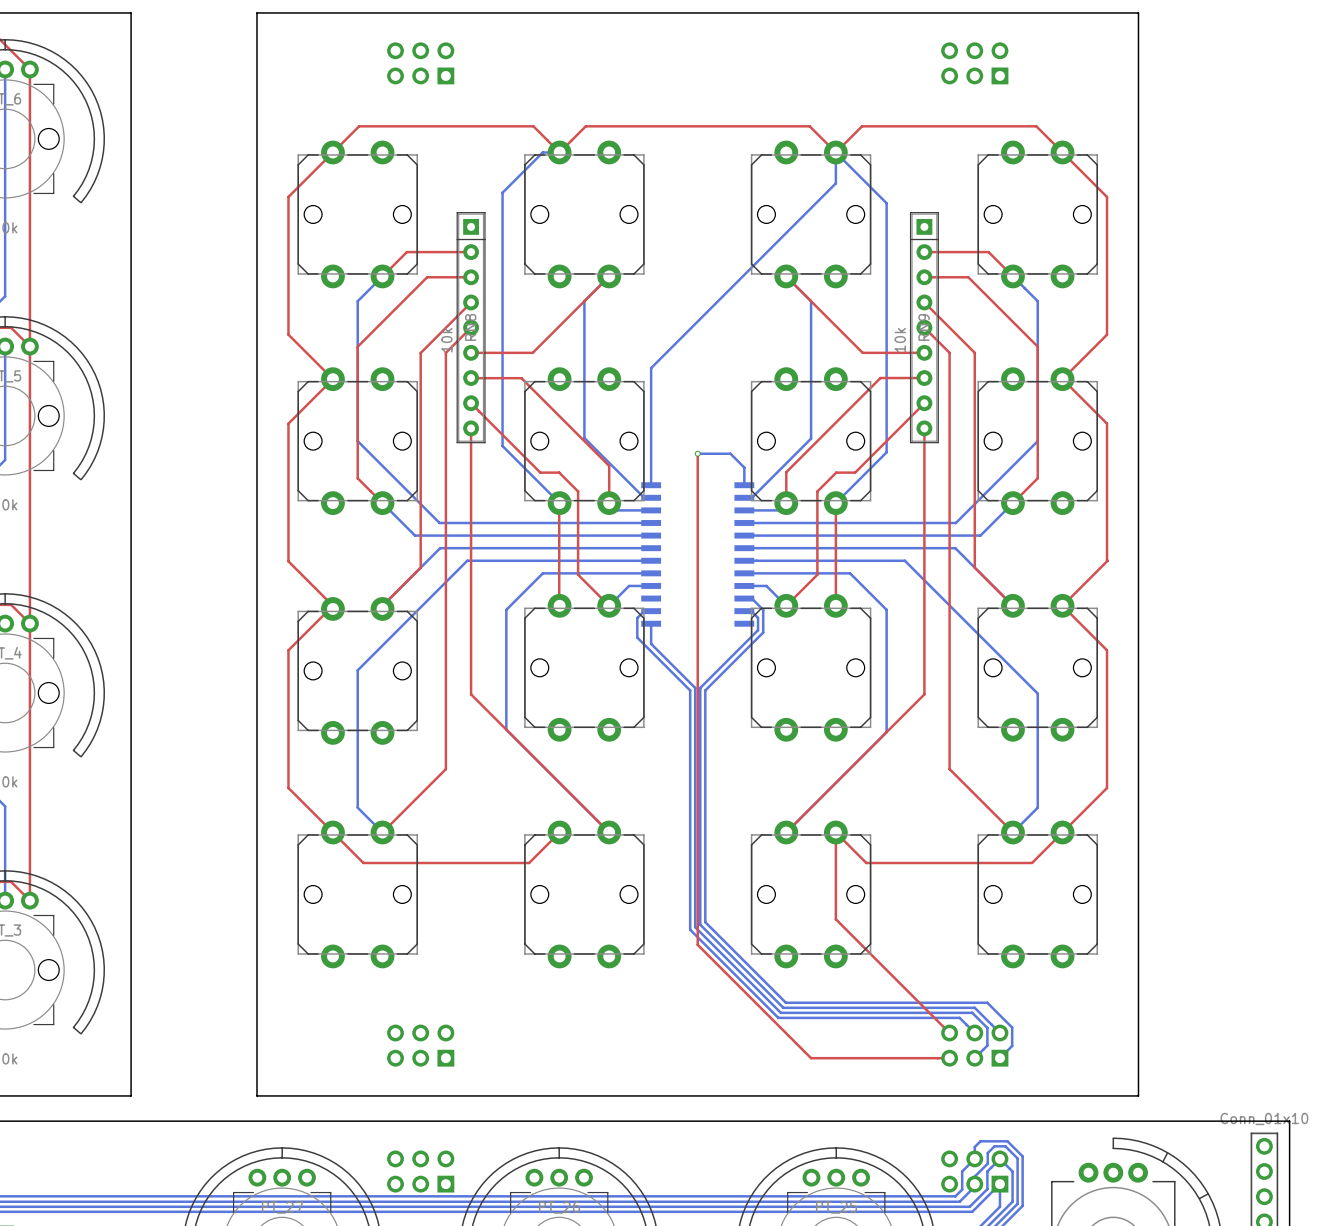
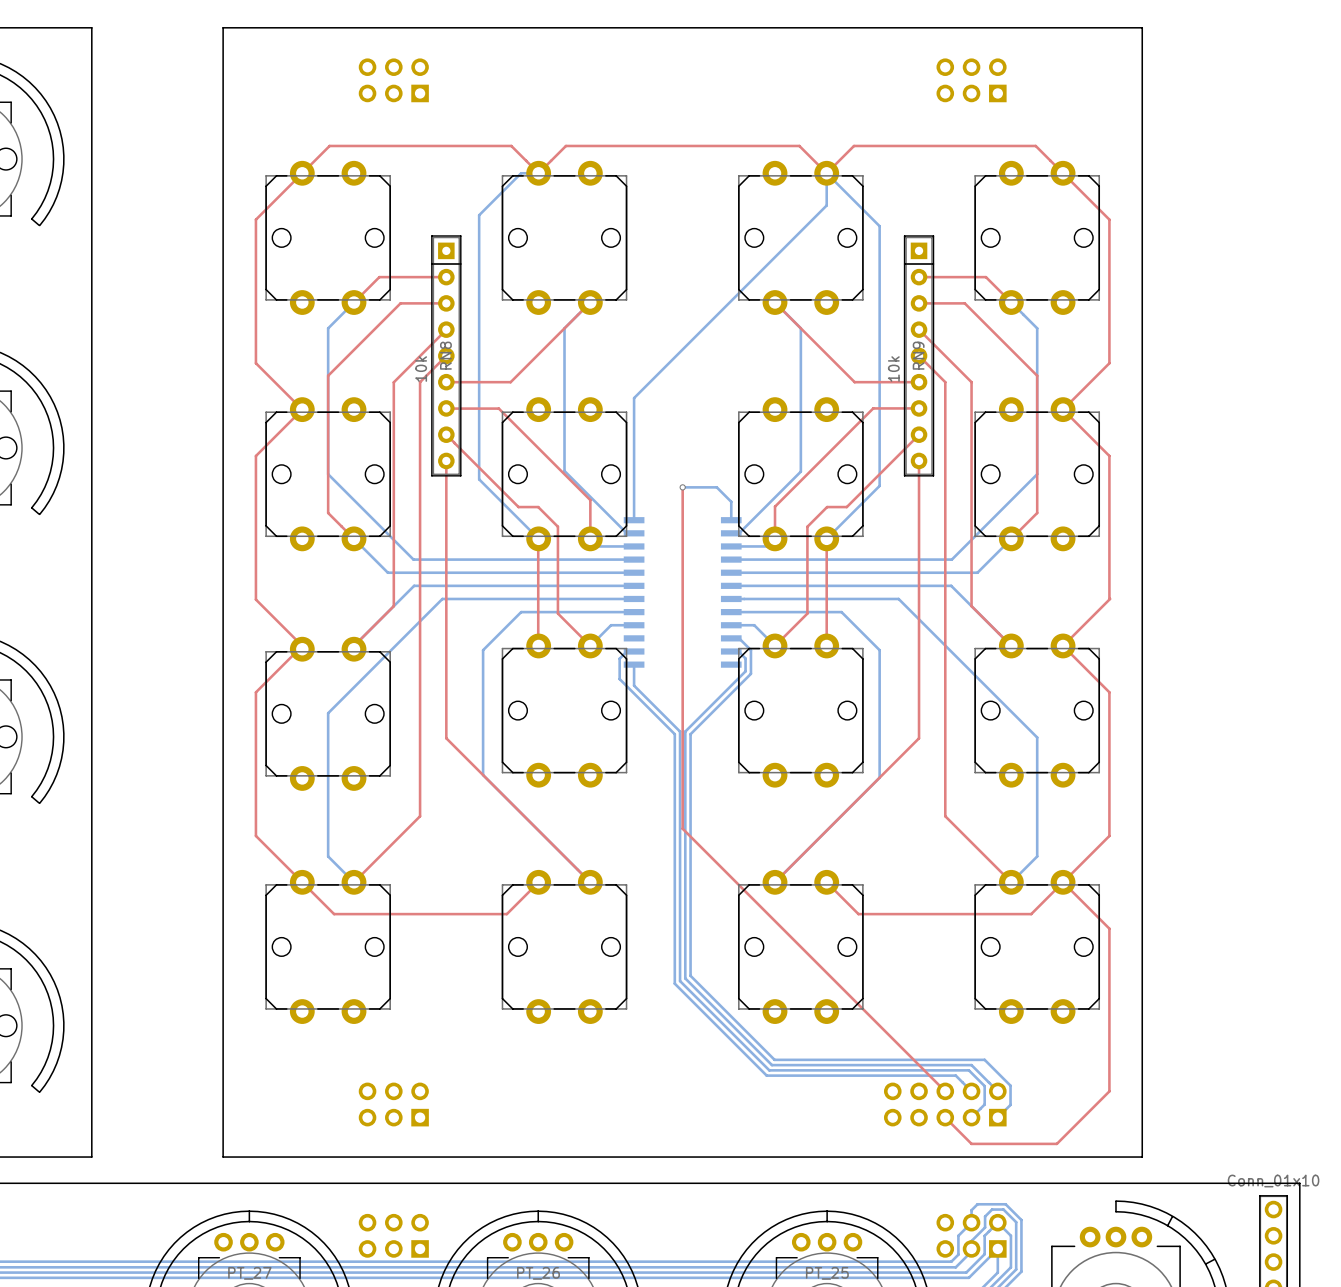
top track: (697, 781) (697, 944) (811, 1058) (949, 1058) -> (1063, 882) (1109, 928) (1109, 1091) (1056, 1143) (971, 1143) (945, 1117)
top track: (835, 832) (835, 919) -> (682, 828) (826, 972)
part: none -> (945, 1104)
part: (974, 1045) -> none

